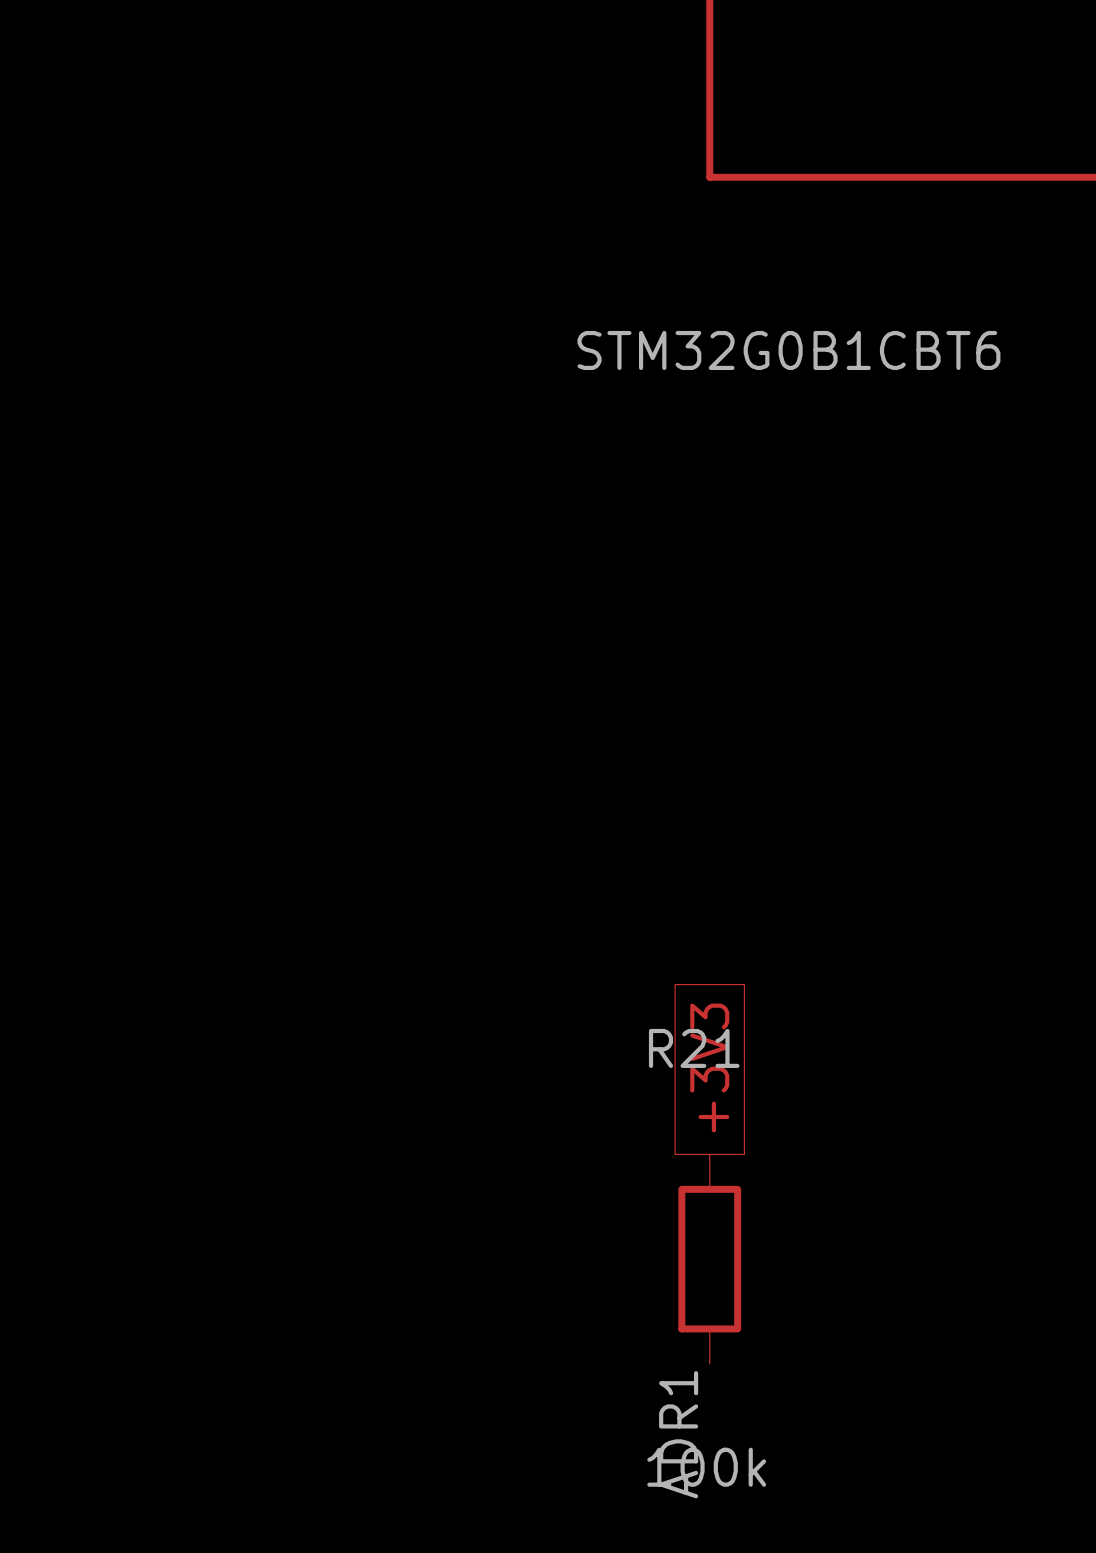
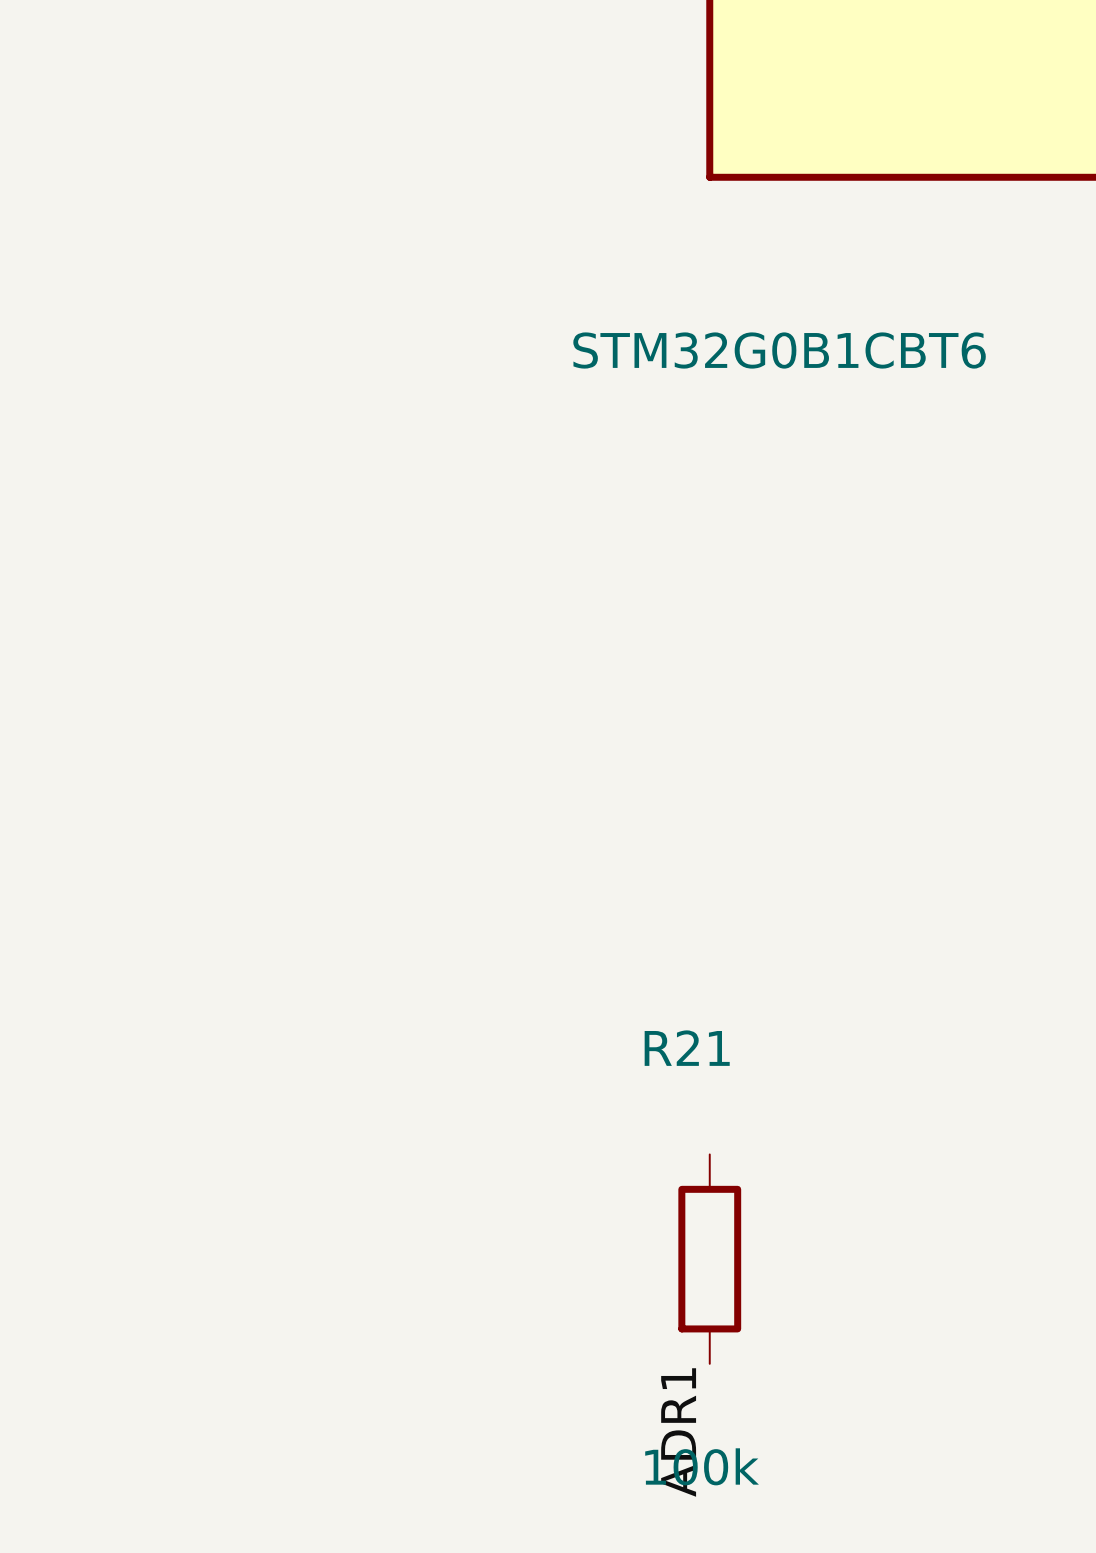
global label: +3V3 (709, 1067) -> none

